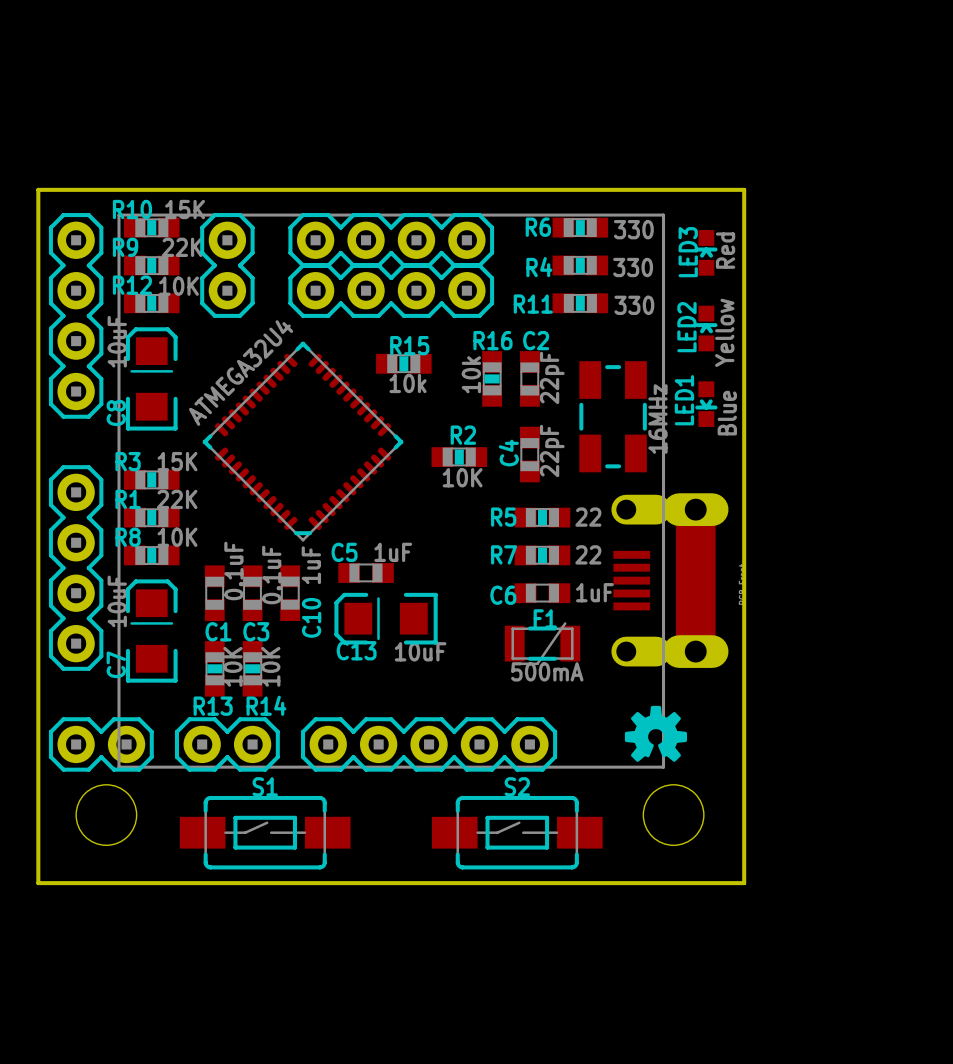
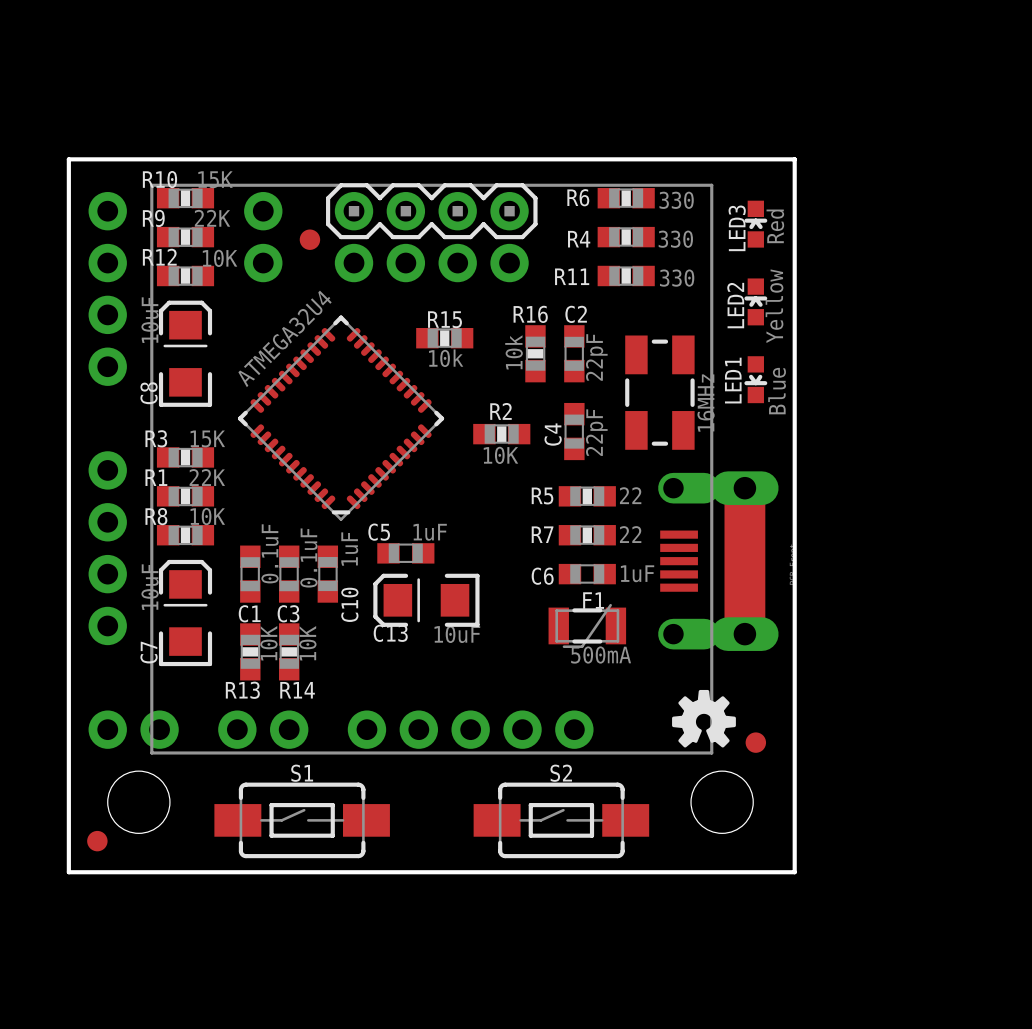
part side: top (227, 265) -> bottom (263, 237)
part: none -> (309, 239)
part side: top (391, 290) -> bottom (431, 263)
part side: top (76, 315) -> bottom (107, 288)
part side: top (76, 568) -> bottom (107, 548)
part side: top (101, 744) -> bottom (133, 729)
part side: top (227, 744) -> bottom (263, 729)
part side: top (429, 744) -> bottom (470, 729)
part: none -> (755, 742)
part: none -> (97, 841)

